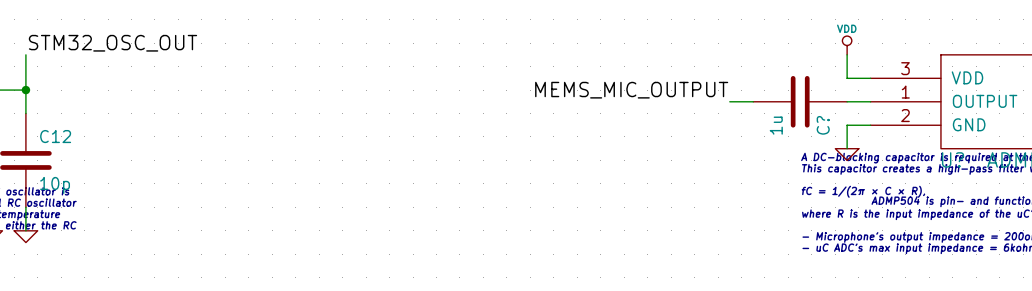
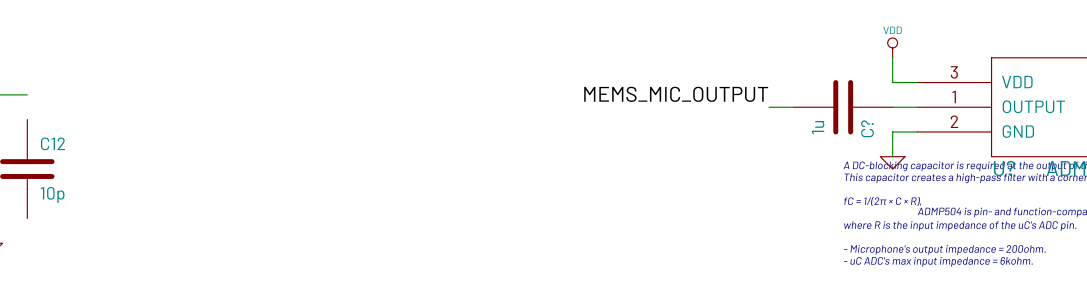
label: STM32_OSC_OUT (112, 43) -> none
wire: (25, 54) (25, 113) -> none
junction: (25, 90) -> none
wire: (25, 207) (25, 230) -> none
power symbol: (25, 236) -> none

